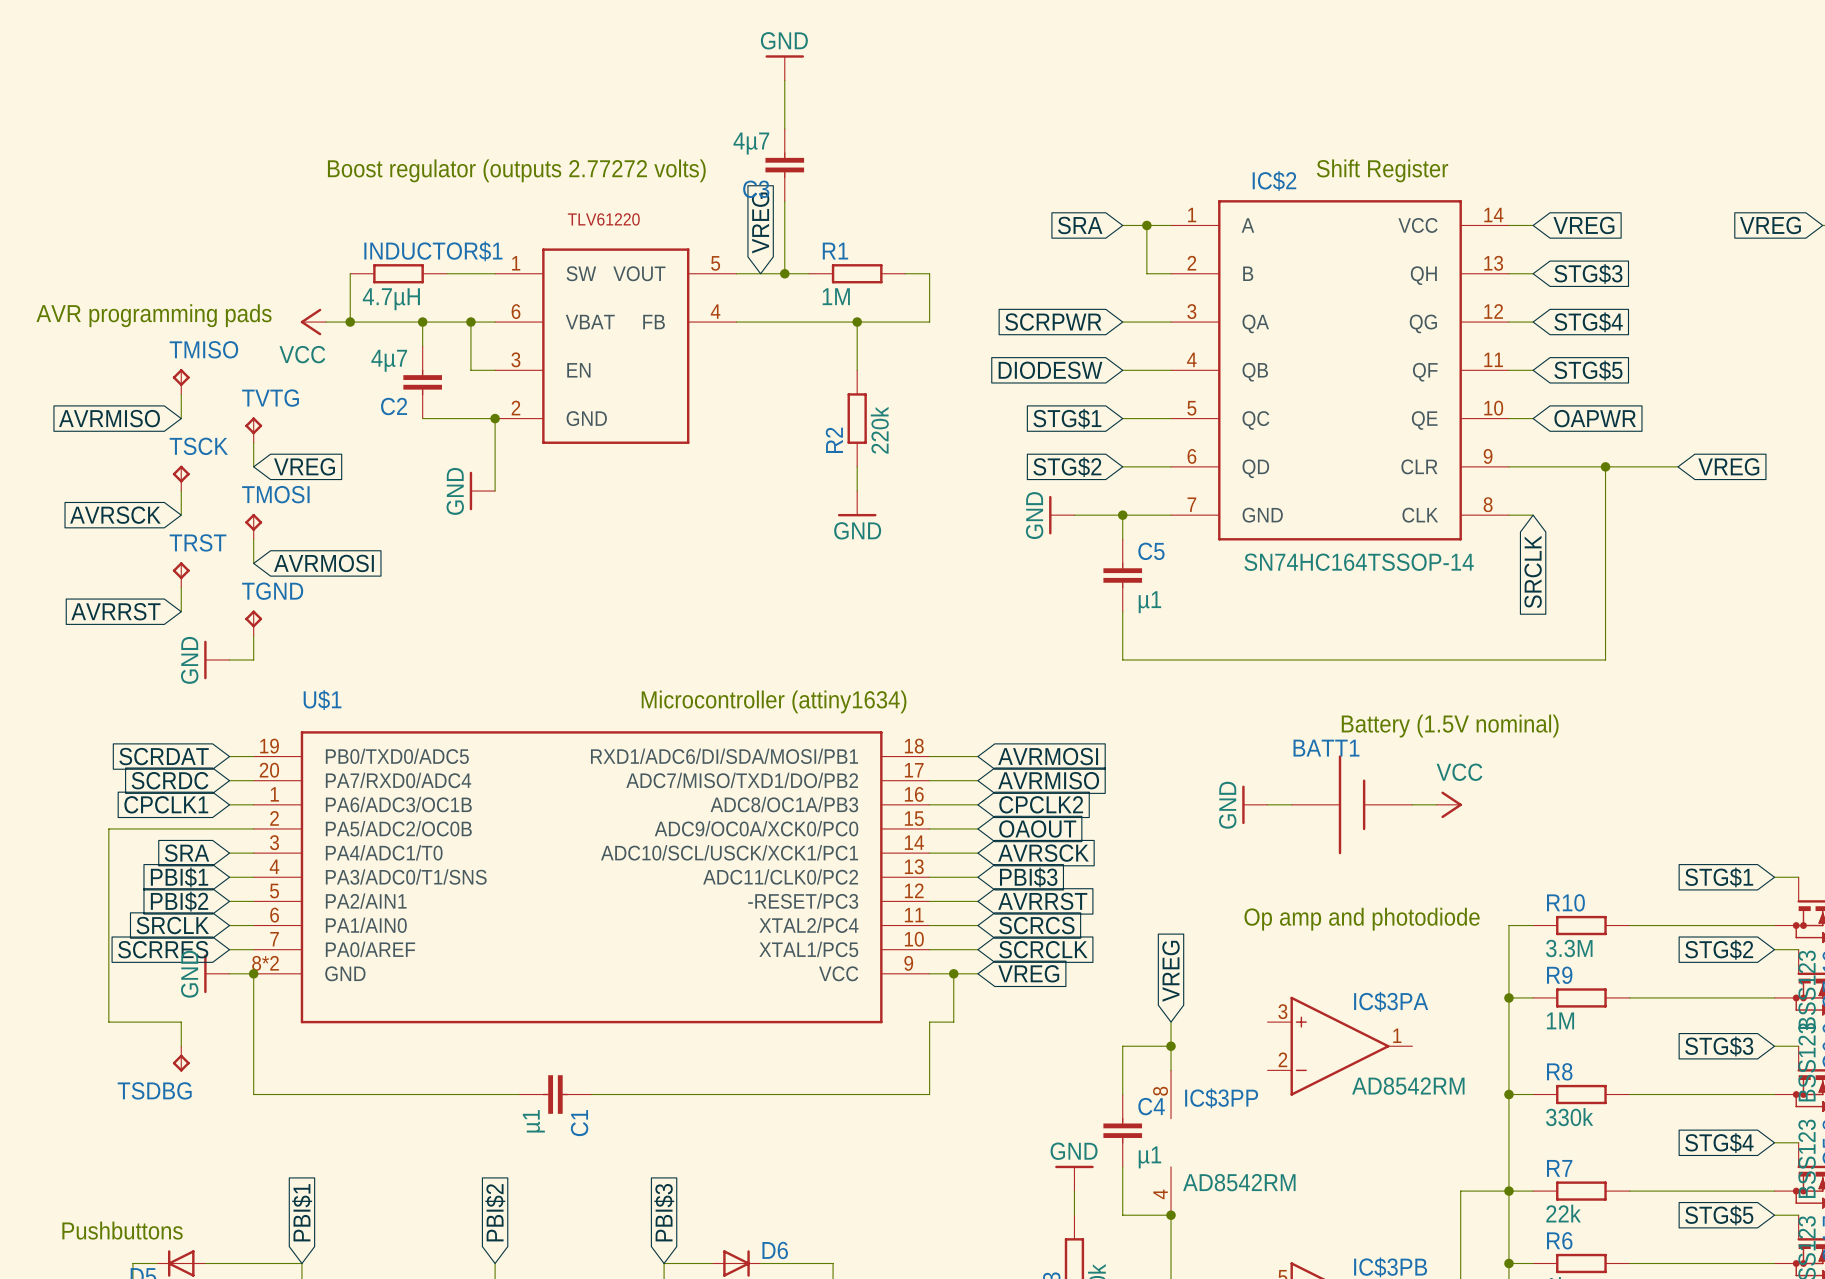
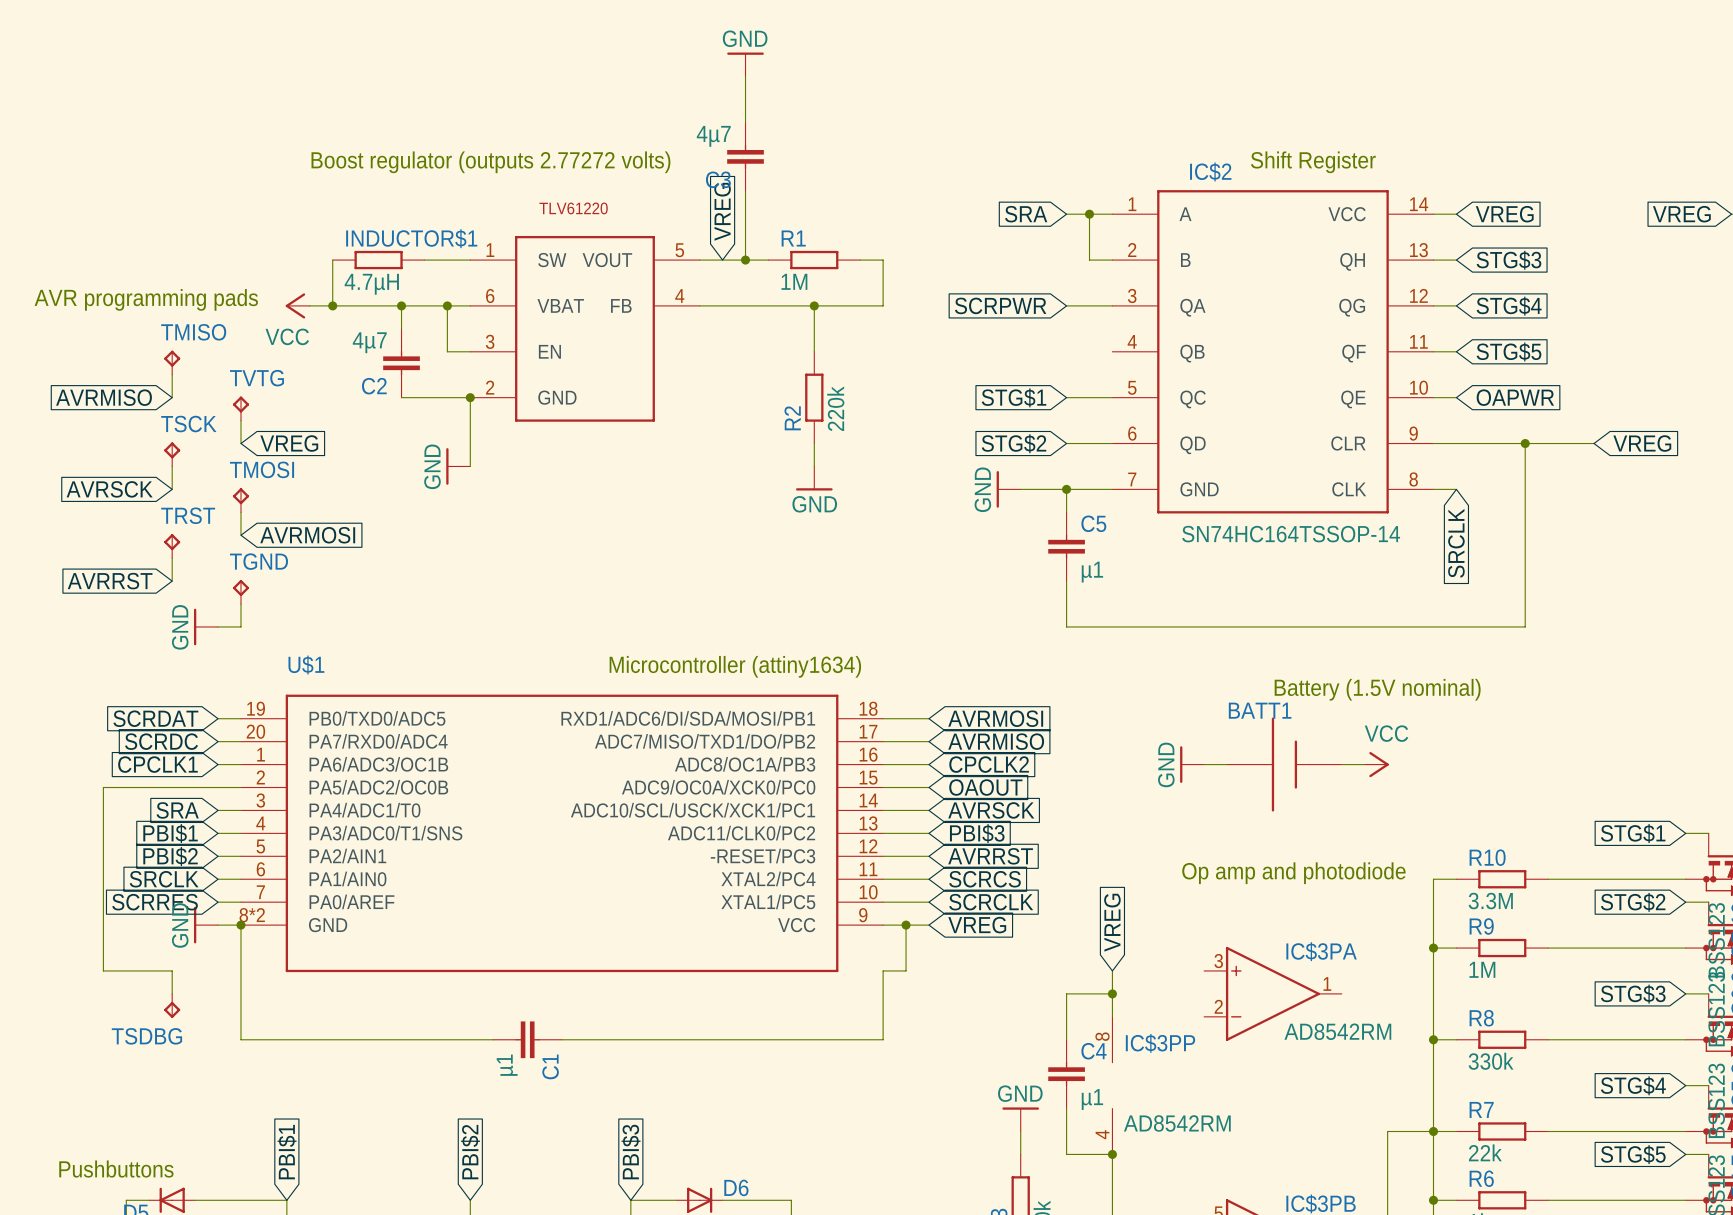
global label: DIODESW (1050, 370) -> none
wire: (1122, 370) (1171, 370) -> none

